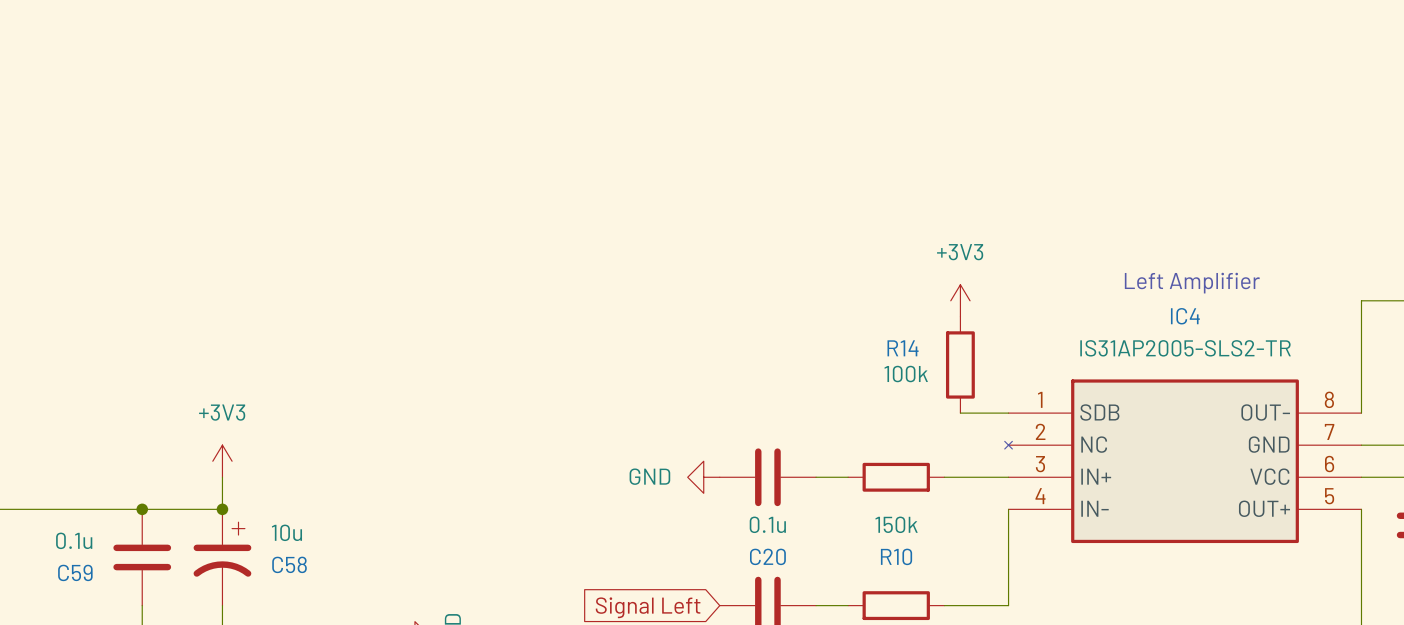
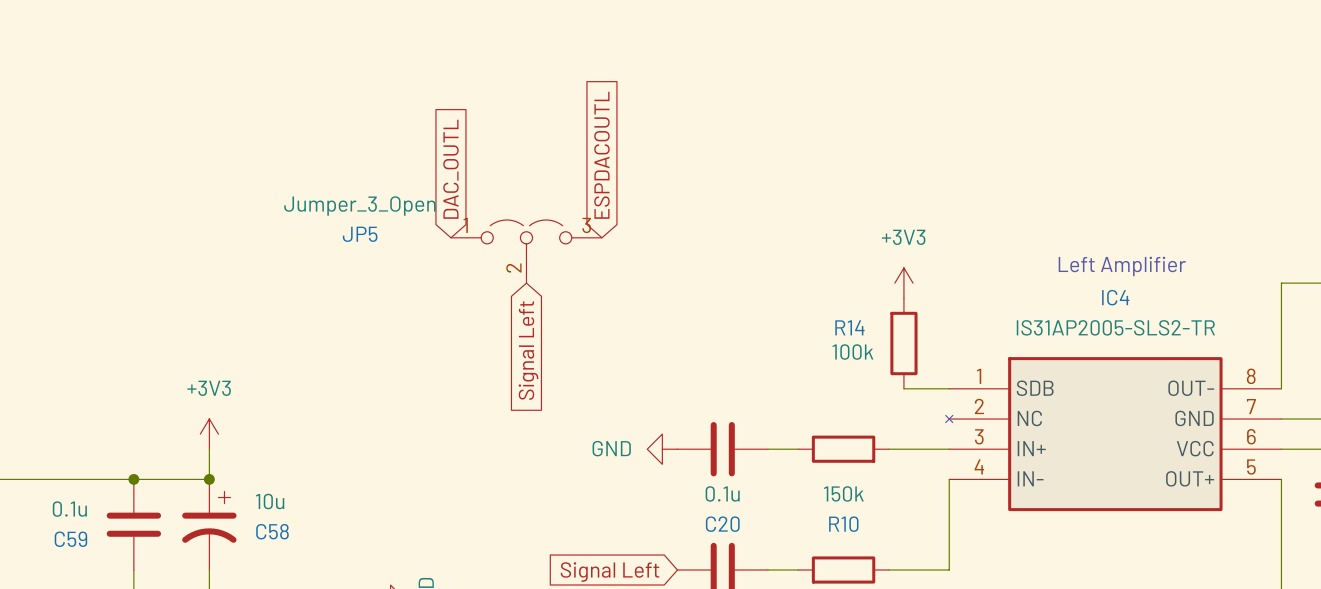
global label: none -> ESPDACOUTL (601, 155)
global label: none -> DAC_OUTL (450, 169)
JP5: none -> Jumper_3_Open (526, 251)
global label: none -> Signal Left (528, 350)

